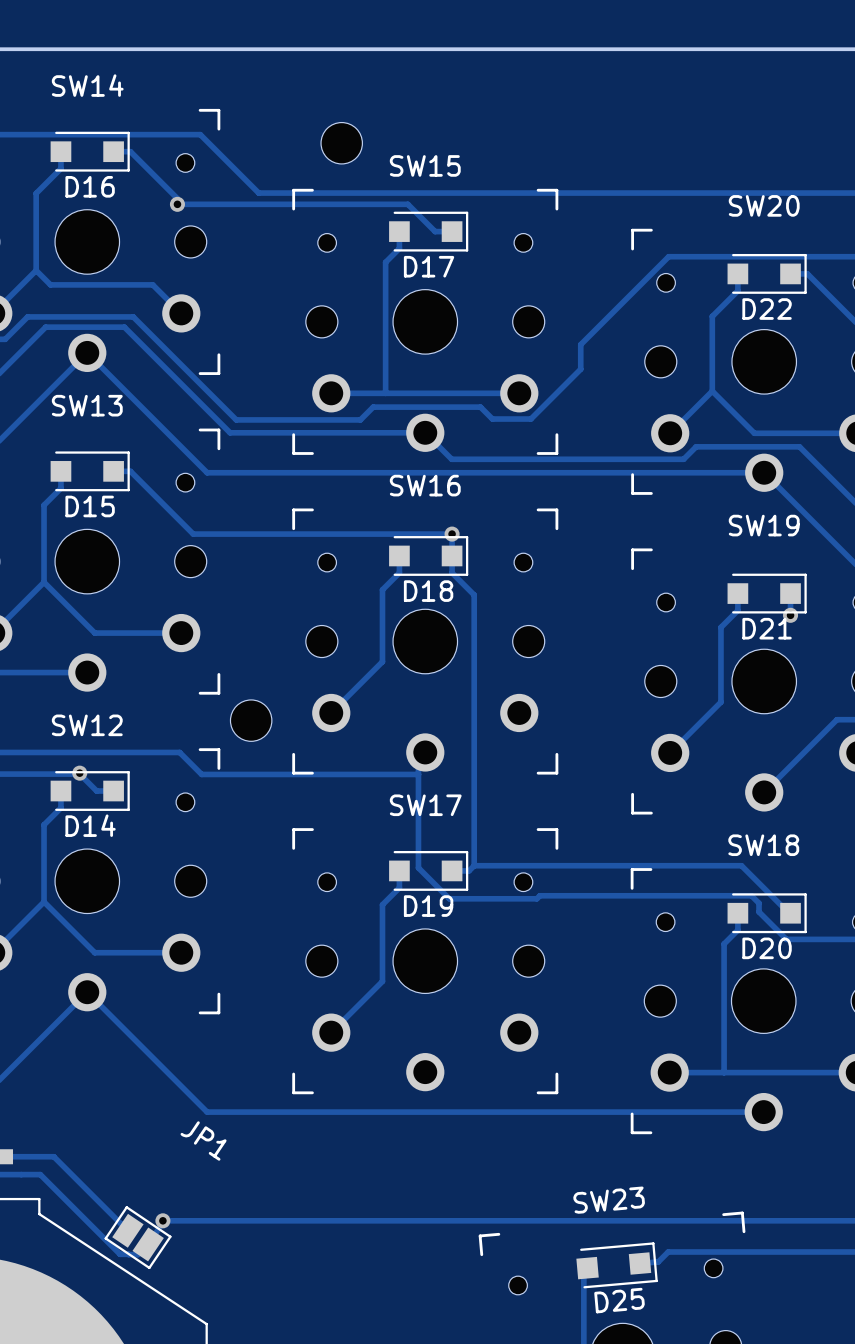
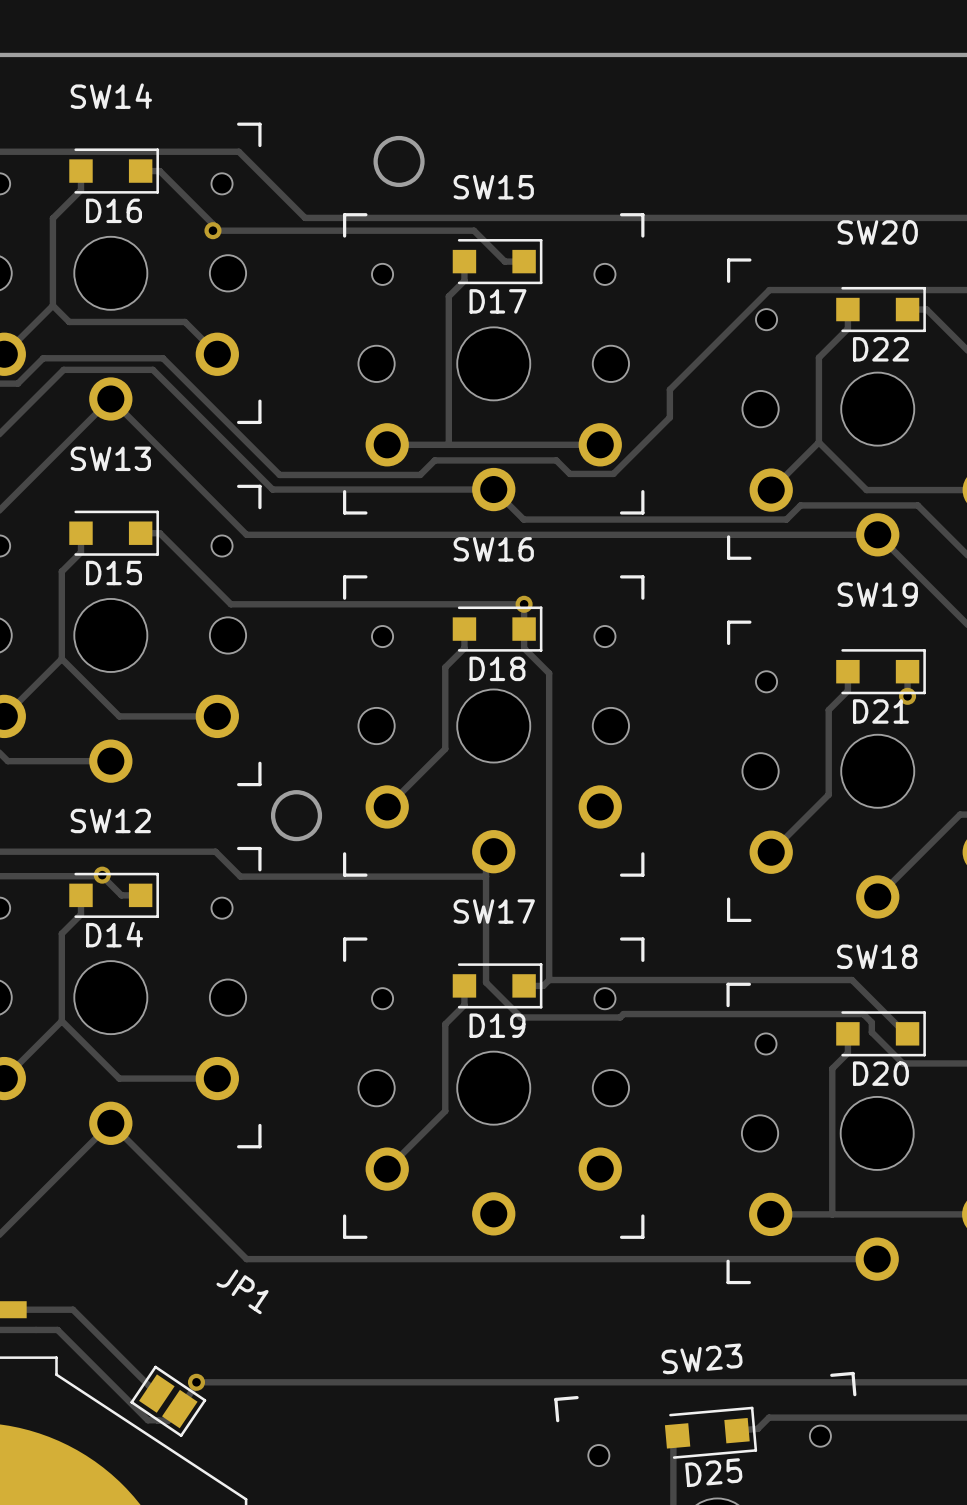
round board edge: none -> [373, 135, 425, 188]
part: (341, 143) -> none
round board edge: none -> [270, 790, 323, 842]
part: (251, 720) -> none

